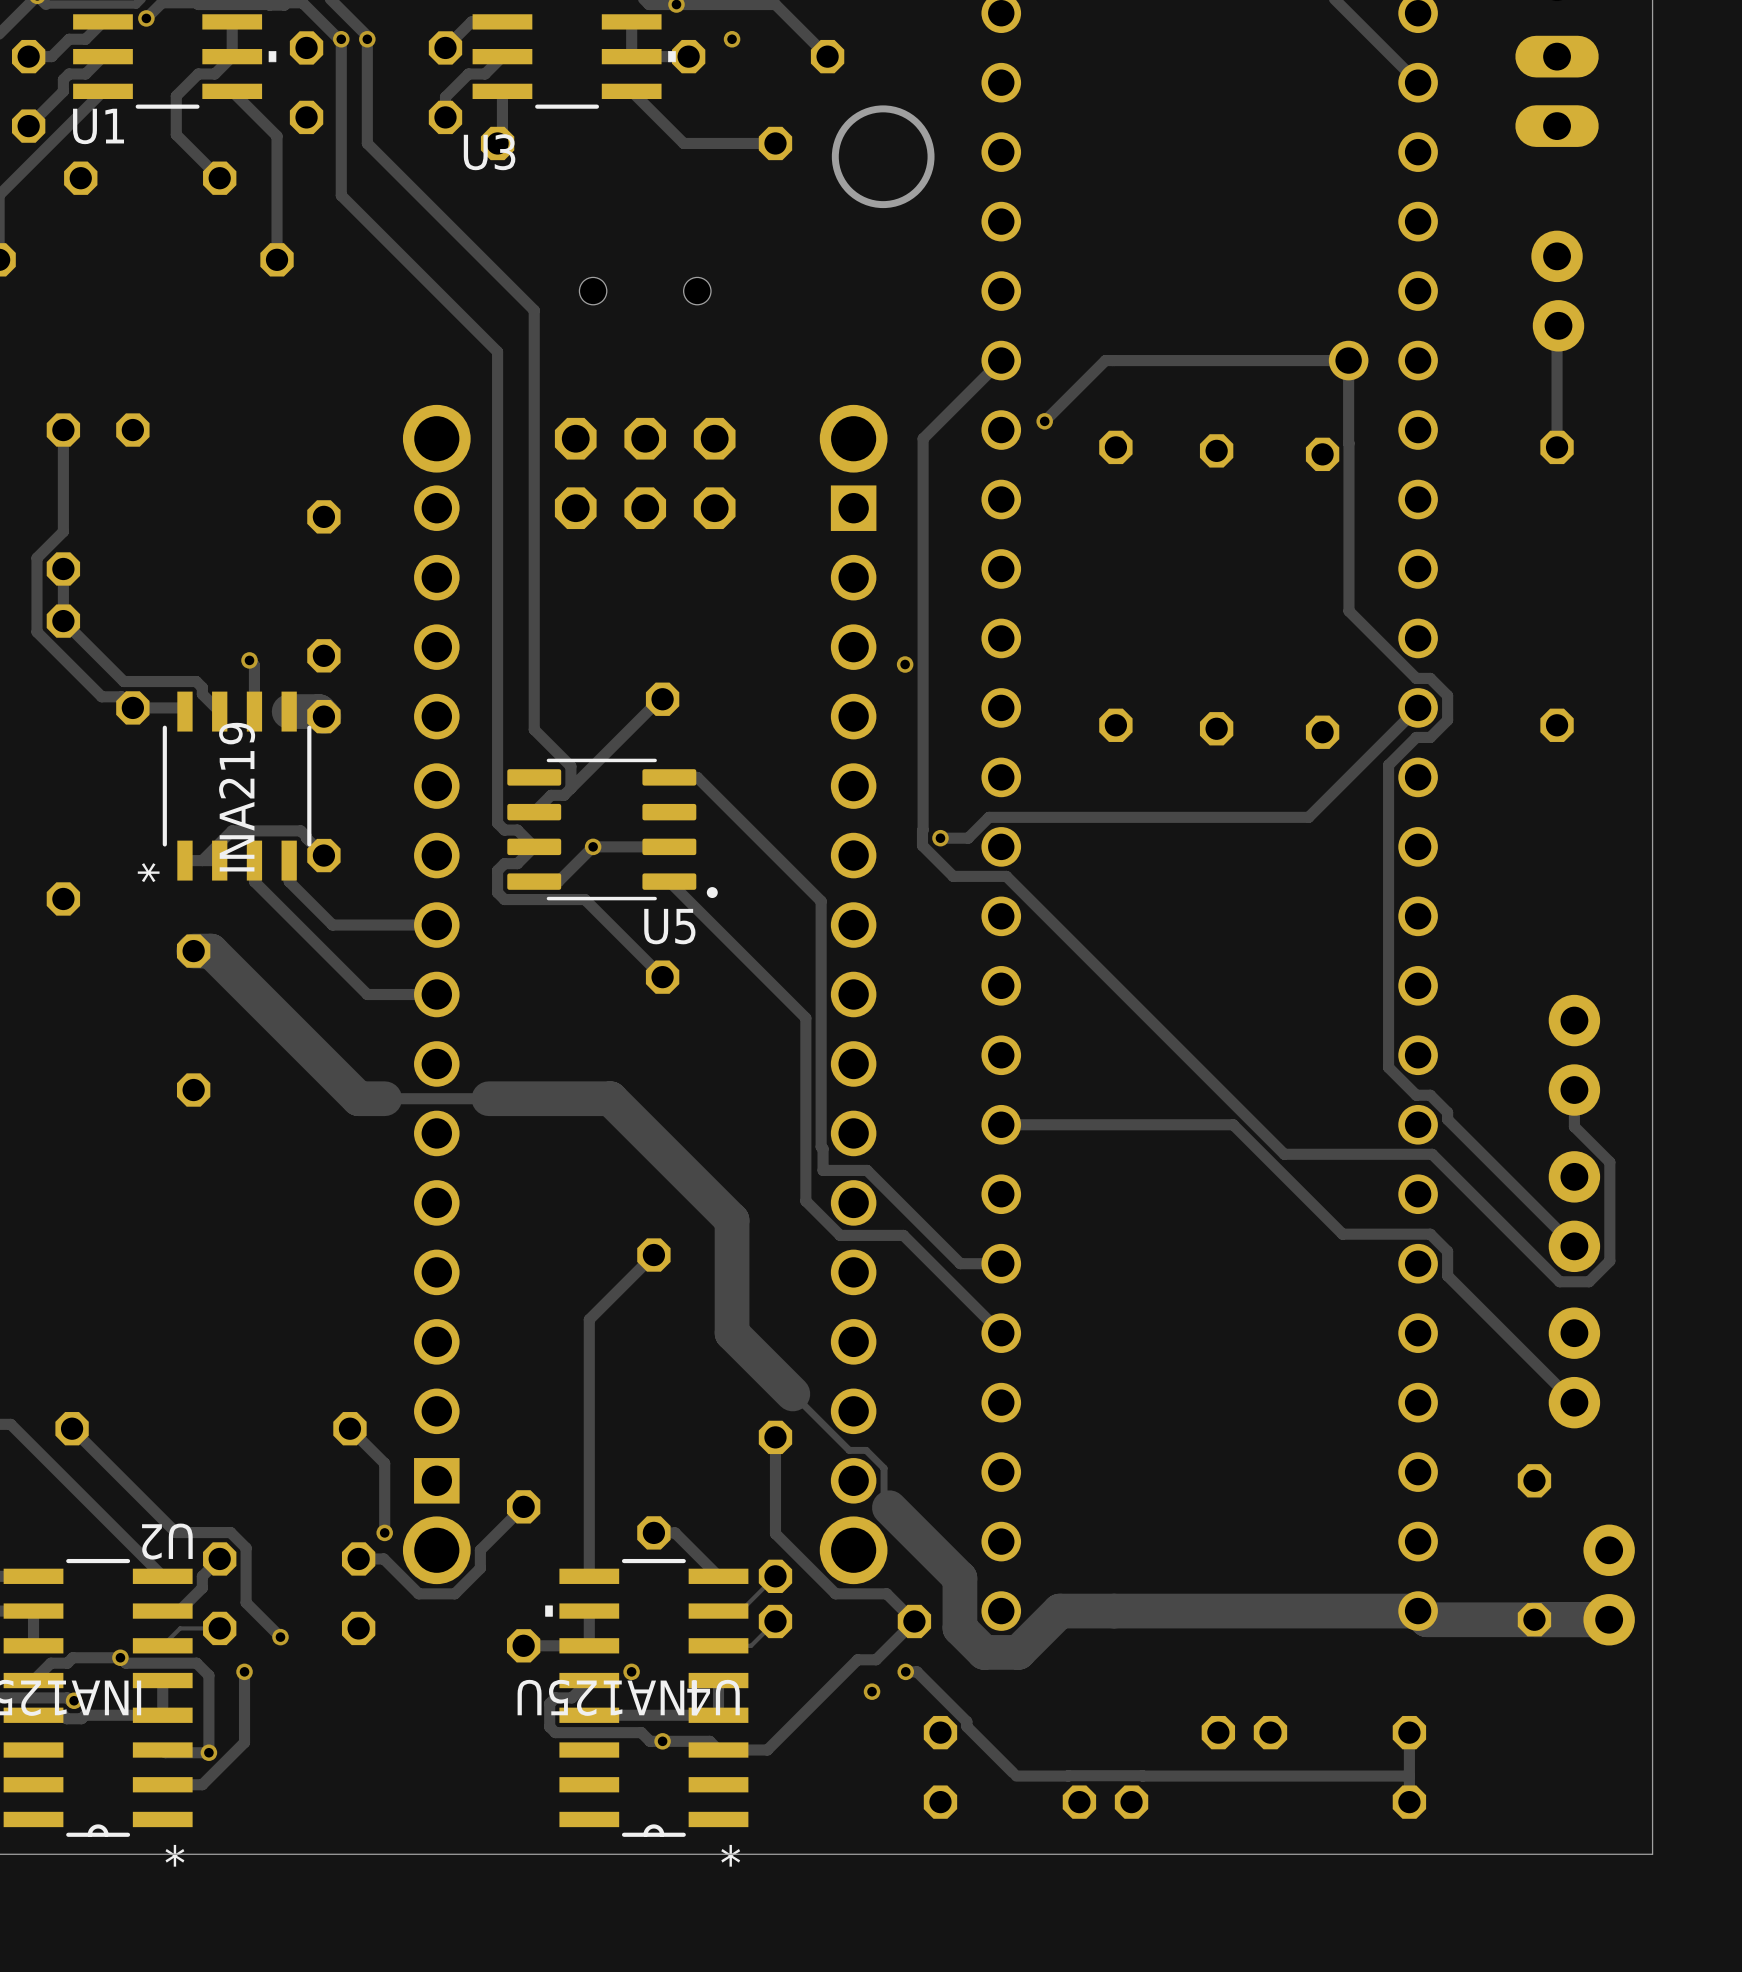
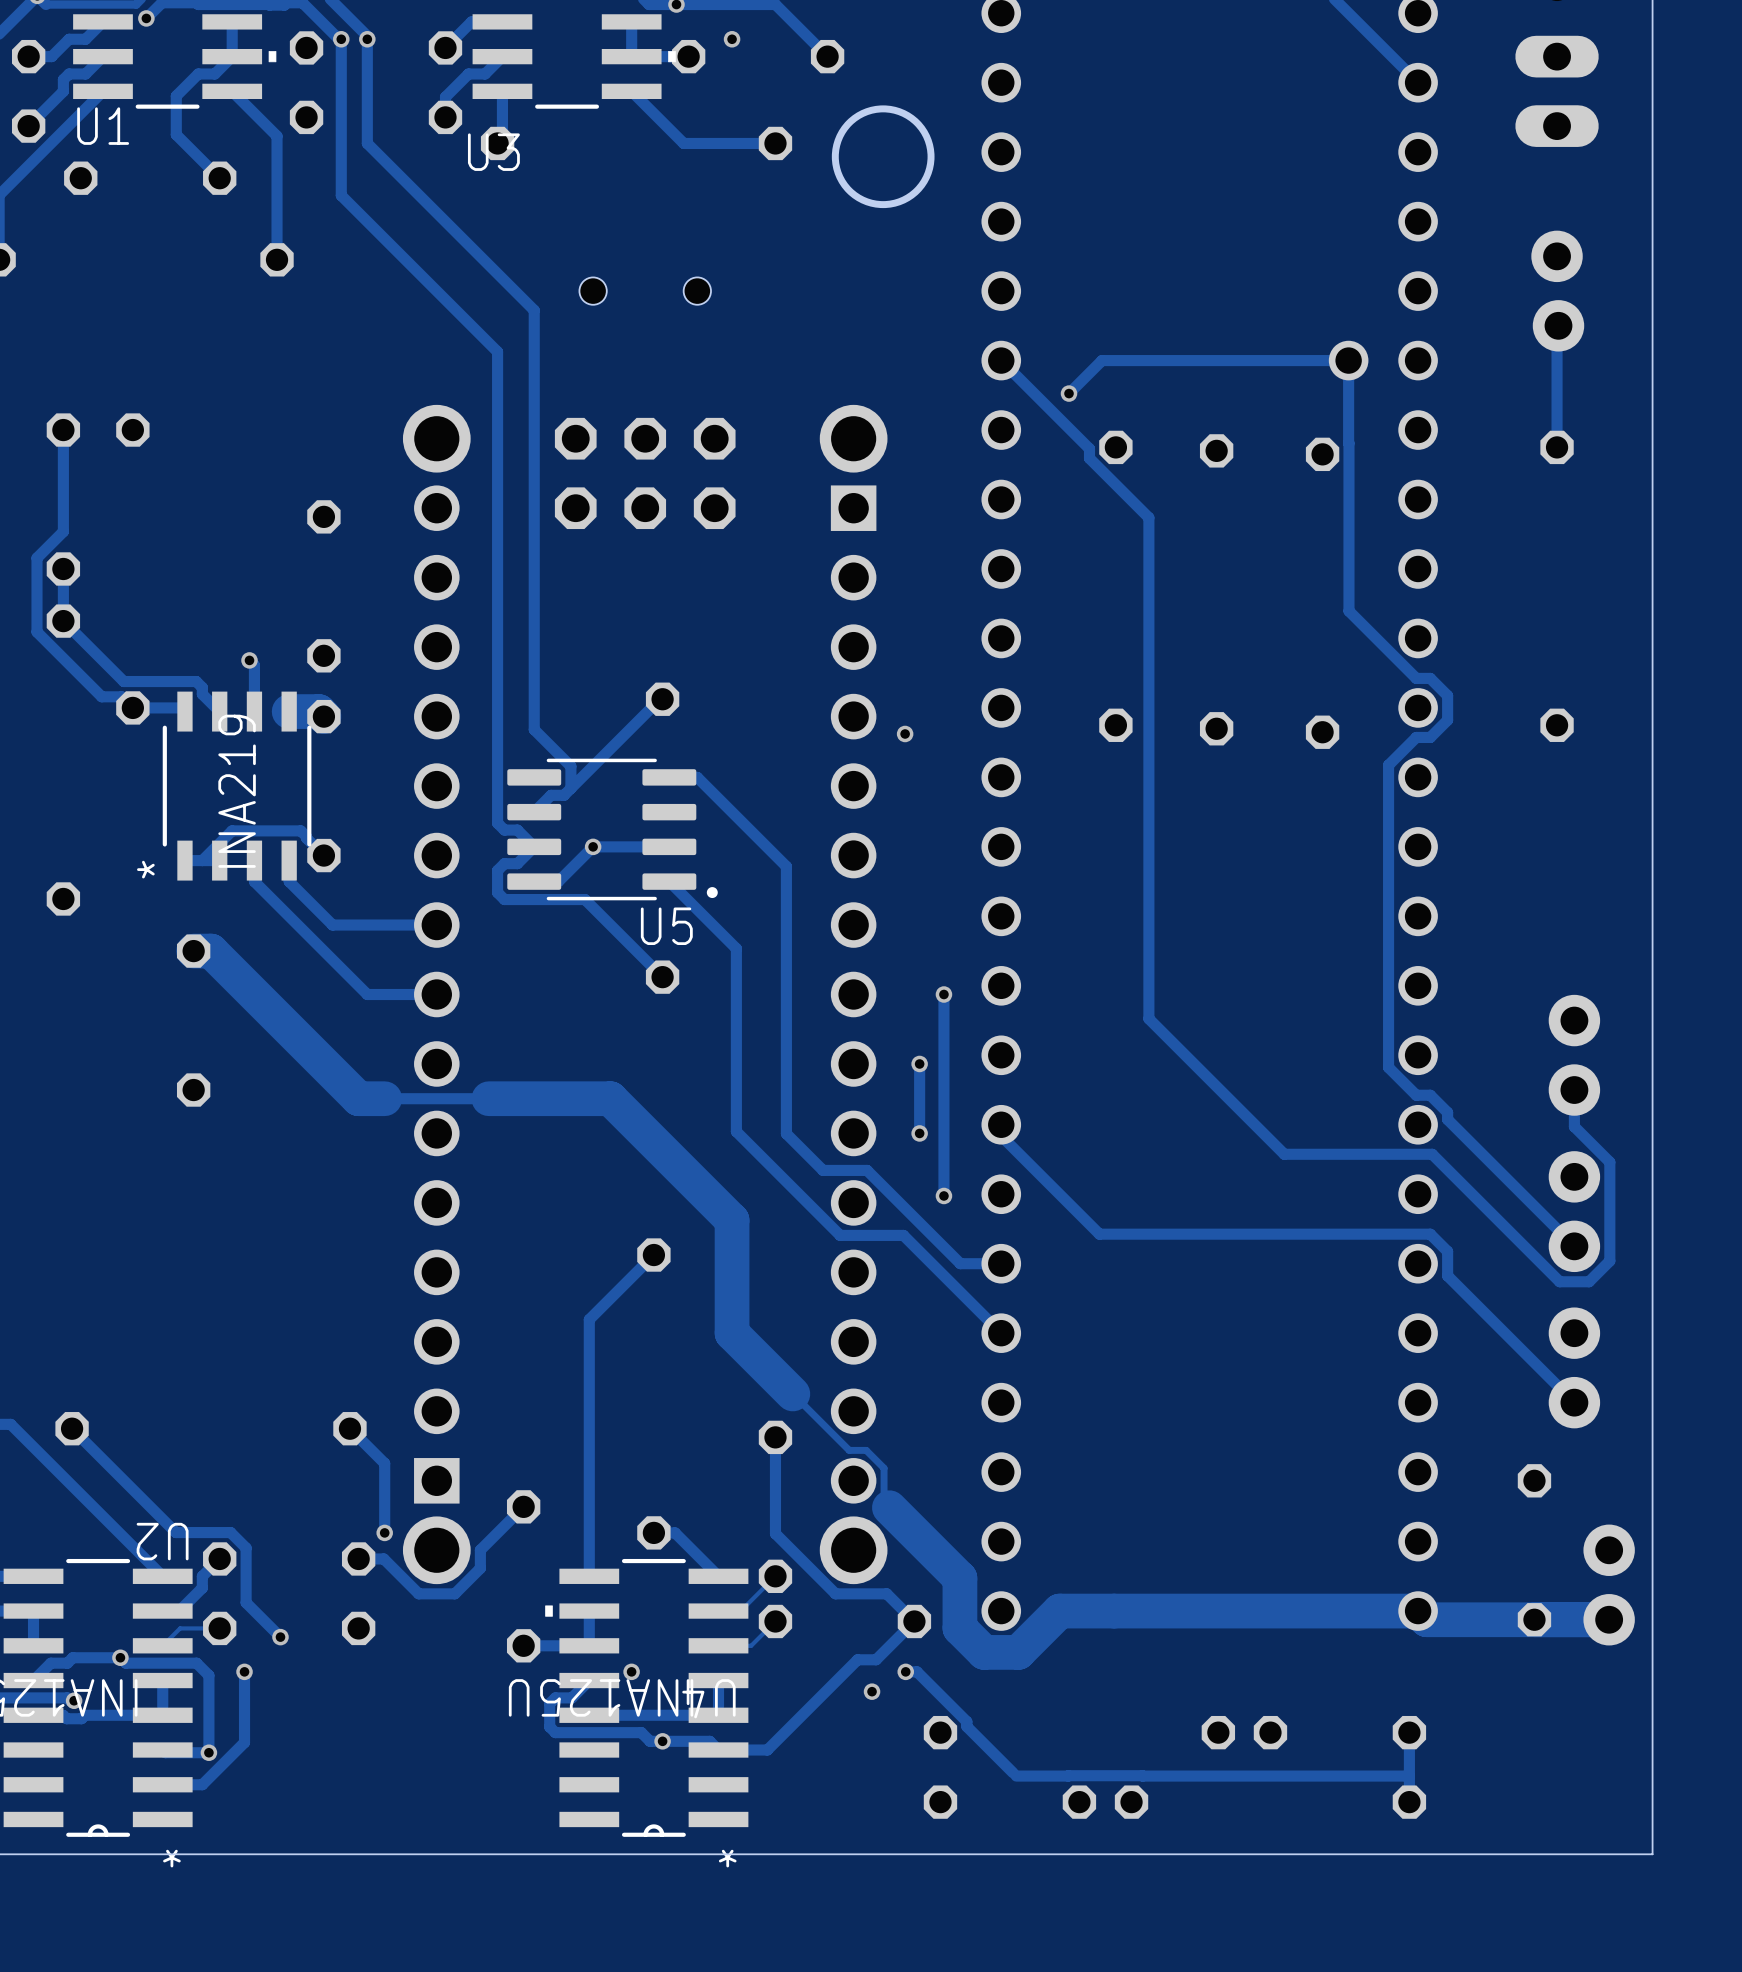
track: (1001, 360) (923, 438) (922, 845) (953, 876) (1006, 876) (1148, 1018) -> (1001, 360) (1089, 448) (1089, 458) (1148, 517) (1148, 1018)
track: (1105, 360) (1044, 421) -> (1105, 360) (1102, 360) (1069, 393)
via position: (1044, 421) -> (1069, 393)
via: (905, 664) -> none
track: (1418, 707) (1308, 817) (989, 817) (968, 838) (940, 838) -> none
via: none -> (905, 733)
via: (940, 838) -> none
track: (786, 866) (821, 901) (821, 1146) (823, 1148) (823, 1170) -> (786, 866) (786, 1133) (823, 1170)
track: (736, 948) (805, 1018) (805, 1201) -> (736, 948) (736, 1131) (805, 1201)
track: none -> (943, 994) (943, 1195)
via: none -> (943, 994)
track: none -> (919, 1063) (919, 1133)
via: none -> (919, 1063)
track: (1001, 1124) (1233, 1124) (1342, 1234) -> (1001, 1124) (1001, 1135) (1099, 1234) (1342, 1234)
via: none -> (919, 1133)
via: none -> (943, 1195)

